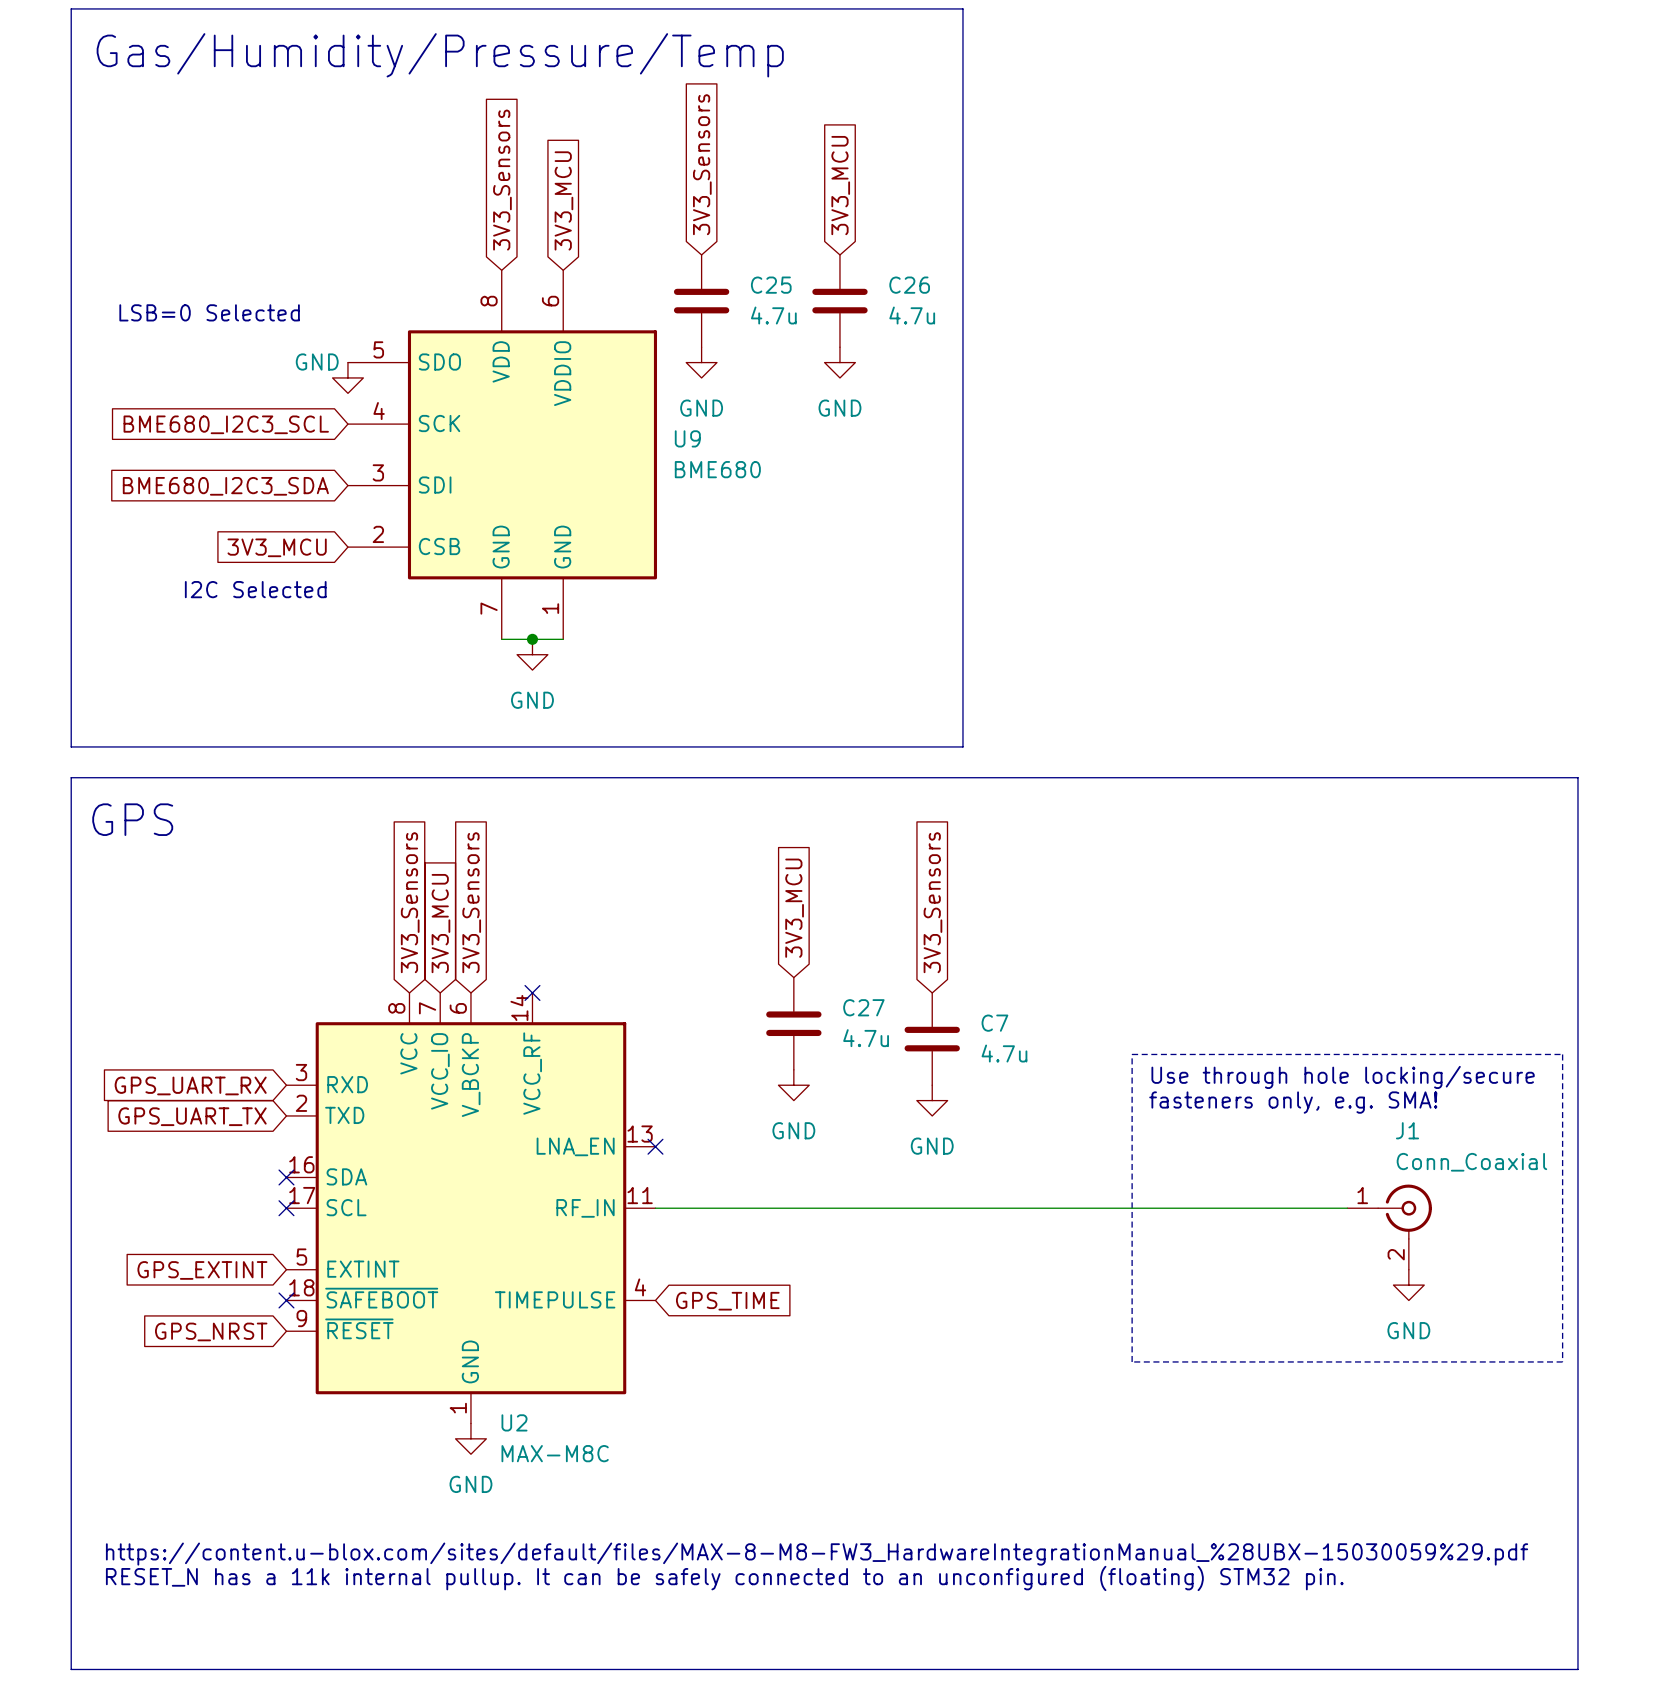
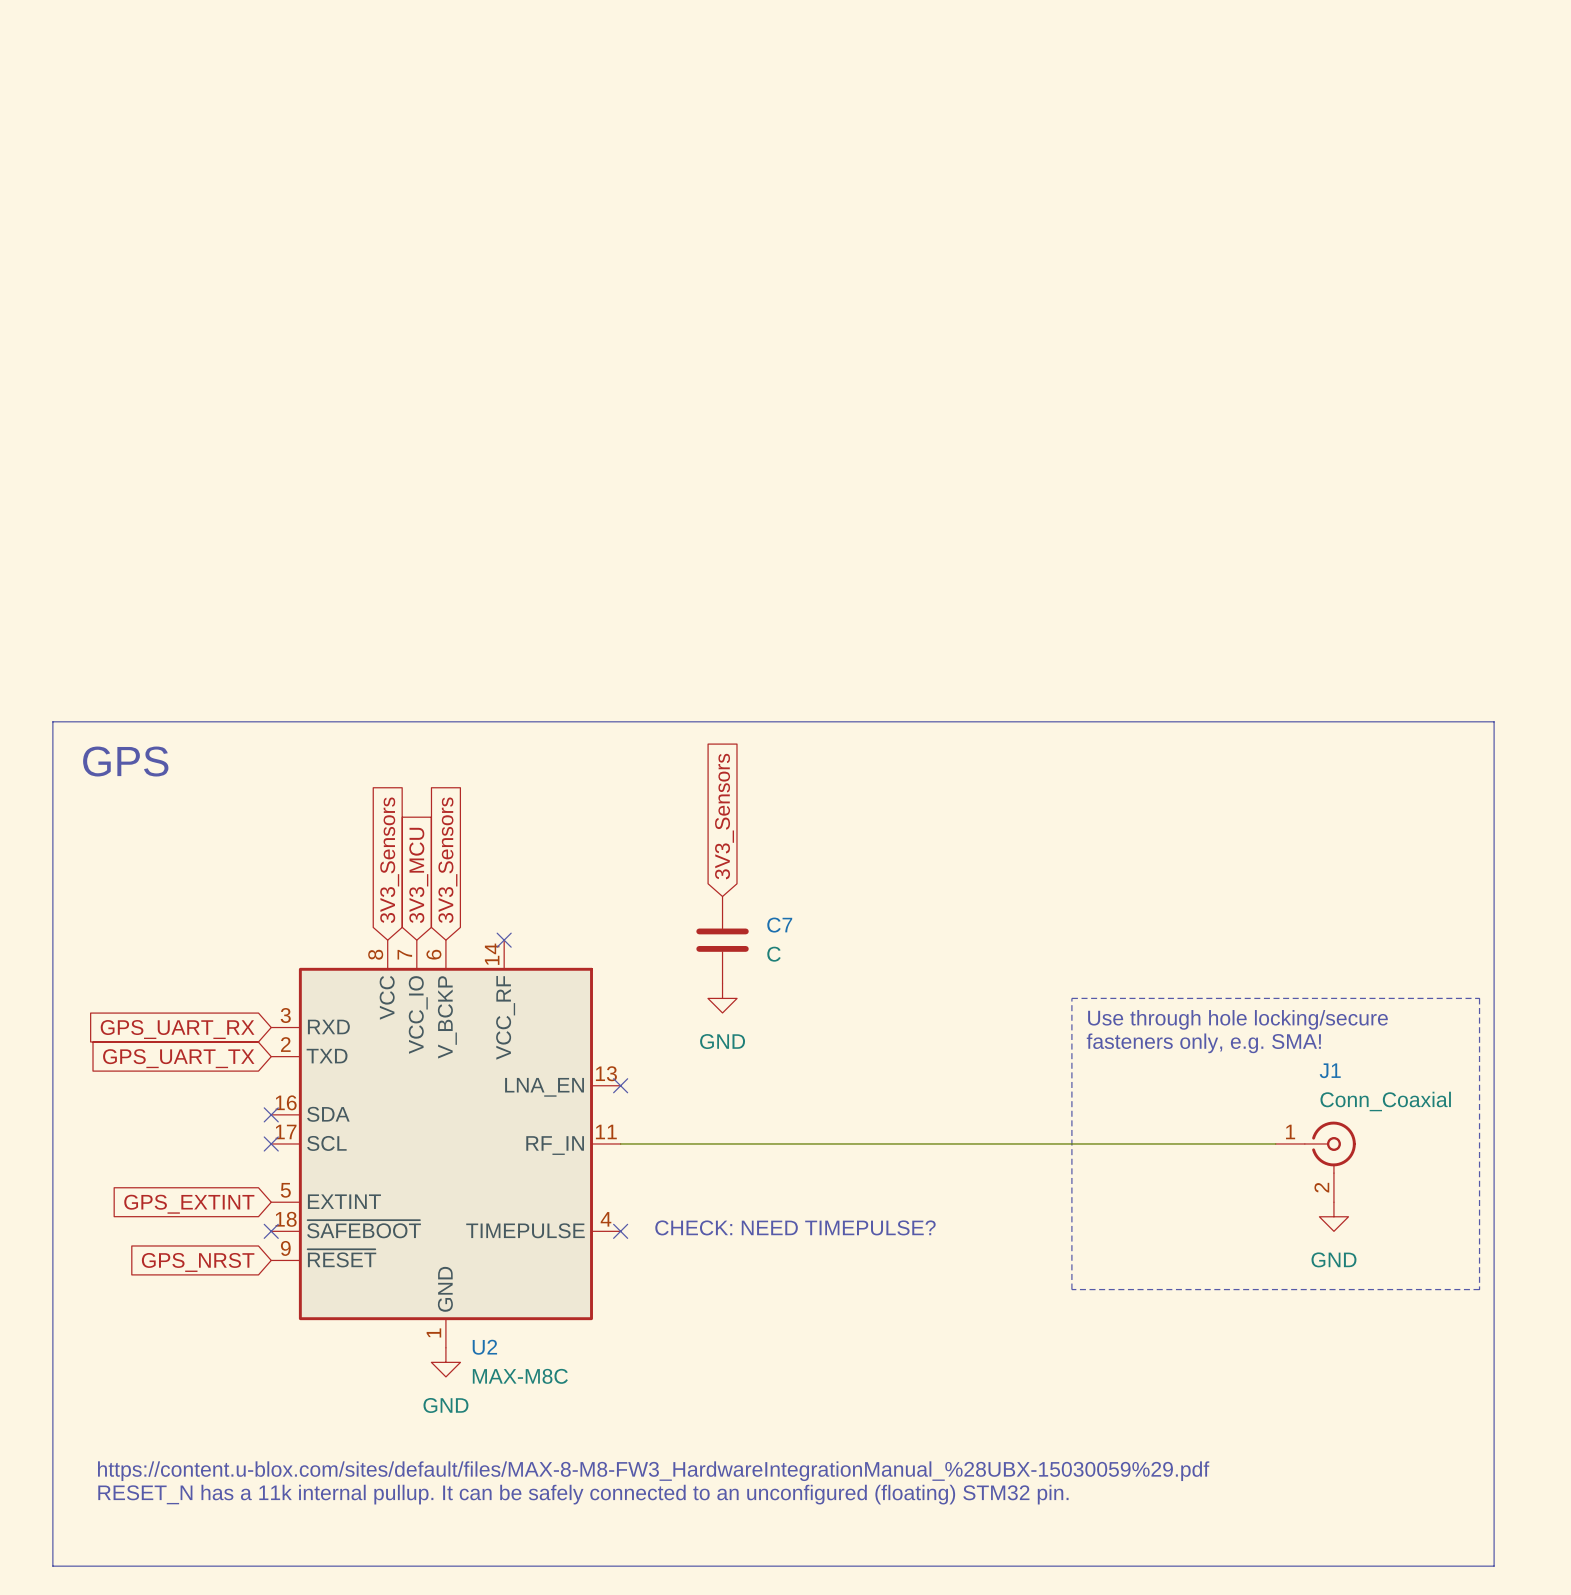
line: (71, 8) (71, 746) (962, 746) (962, 8) (71, 8) -> none
text: Gas/Humidity/Pressure/Temp (440, 55) -> none
global label: 3V3_Sensors (702, 164) -> none
global label: 3V3_Sensors (502, 180) -> none
global label: 3V3_MCU (840, 185) -> none
global label: 3V3_MCU (563, 200) -> none
C25: 4.7u (701, 301) -> none
C26: 4.7u (839, 301) -> none
text: LSB=0 Selected (209, 312) -> none
power symbol: GND (701, 362) -> none
power symbol: GND (839, 362) -> none
power symbol: GND (347, 377) -> none
global label: BME680_I2C3_SCL (226, 424) -> none
U9: BME680 (502, 454) -> none
global label: BME680_I2C3_SDA (225, 486) -> none
global label: 3V3_MCU (277, 547) -> none
text: I2C Selected (255, 589) -> none
wire: (501, 639) (563, 639) -> none
junction: (532, 639) -> none
power symbol: GND (532, 654) -> none
line: (1577, 777) (71, 777) (71, 1669) (1577, 1669) (1577, 1654) -> (1494, 736) (1494, 721) (52, 721) (52, 1566) (1494, 1566)
text position: GPS (132, 819) -> GPS (125, 761)
global label position: 3V3_Sensors (932, 902) -> 3V3_Sensors (724, 816)
global label: 3V3_MCU (794, 908) -> none
C27: 4.7u (793, 1023) -> none
C7 position: (932, 1039) -> (722, 940)
C7 value: 4.7u (1004, 1053) -> C (773, 954)
power symbol position: GND (793, 1085) -> GND (722, 998)
power symbol: GND (932, 1100) -> none
text: none -> CHECK: NEED TIMEPULSE? (795, 1227)
no-connect mark: none -> (620, 1231)
global label: GPS_TIME (727, 1301) -> none

